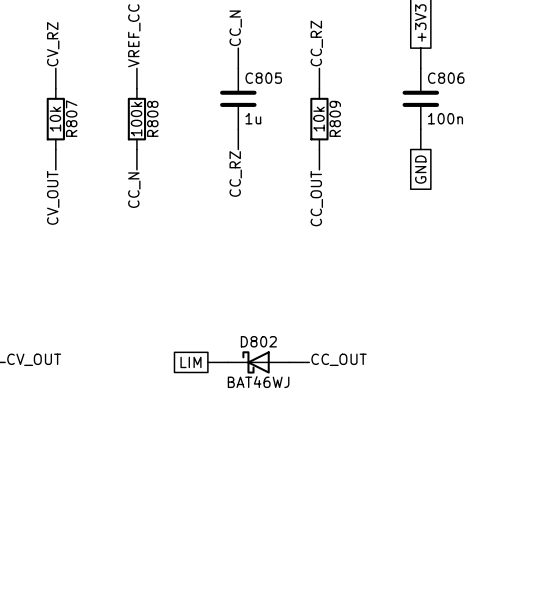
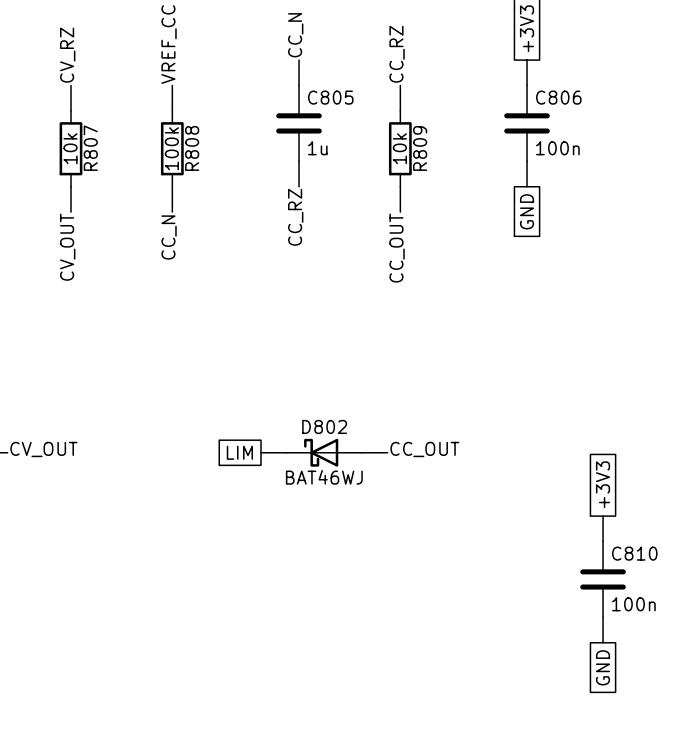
global label: none -> +3V3 (603, 484)
wire: none -> (603, 516) (603, 541)
C810: none -> 100n (603, 579)
wire: none -> (603, 617) (603, 642)
global label: none -> GND (603, 667)

